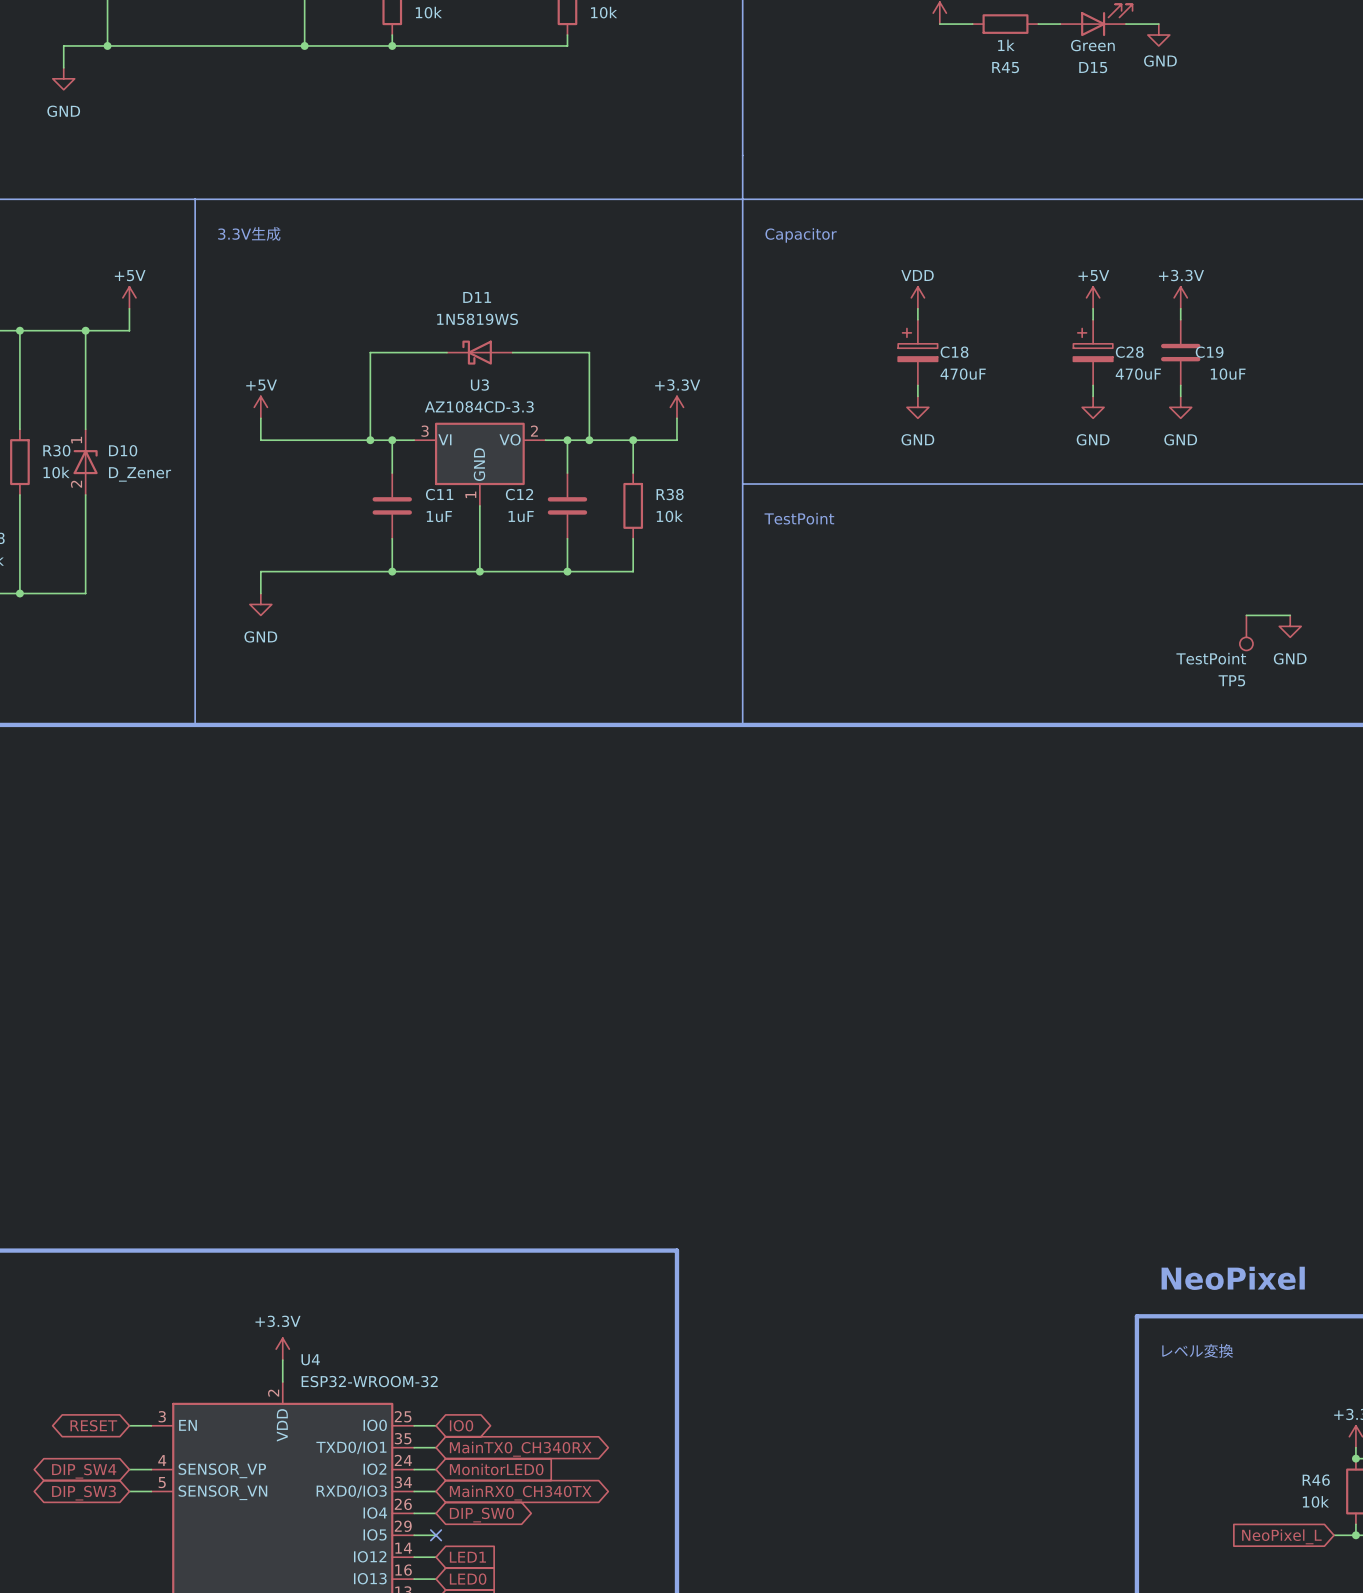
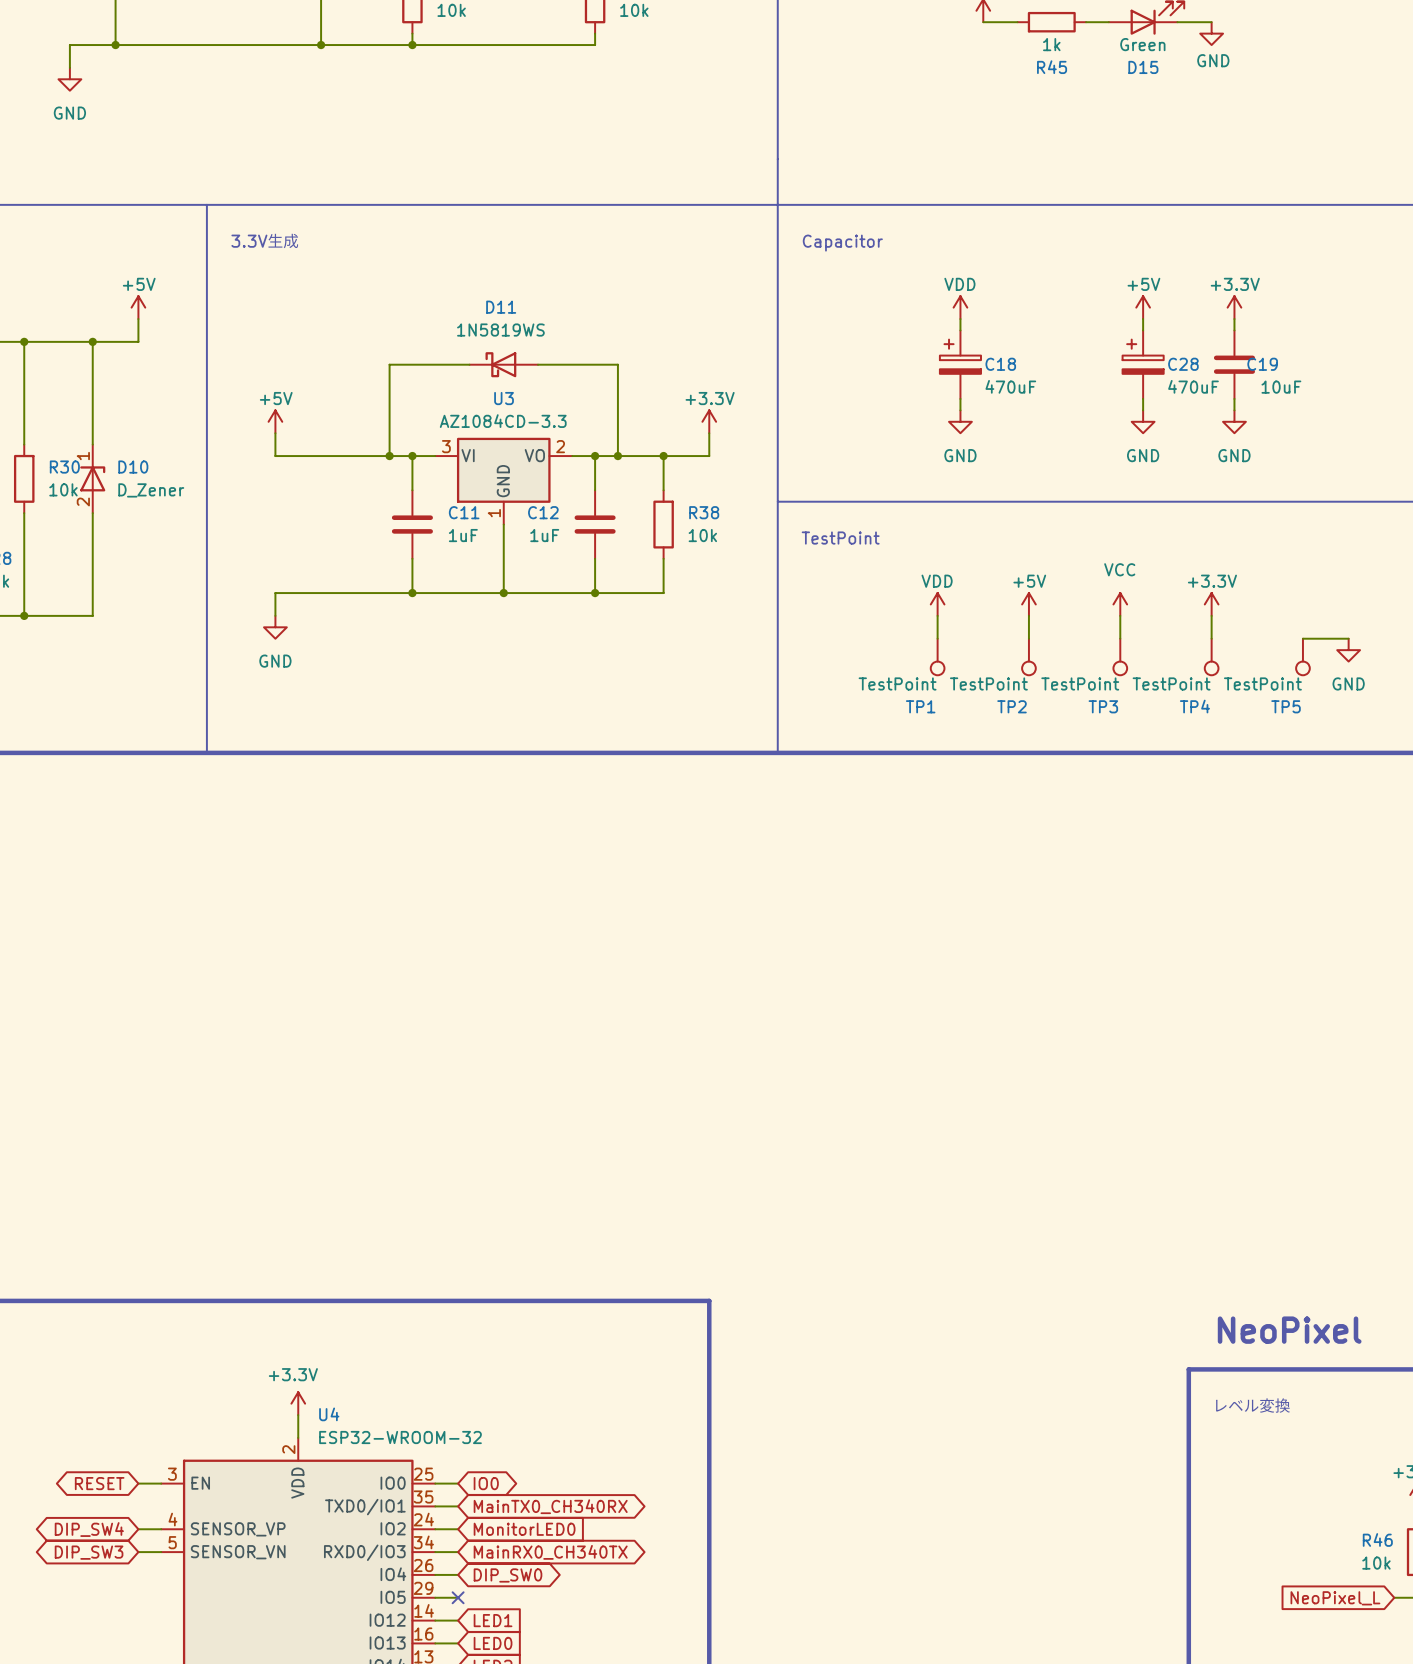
power symbol: none -> VDD (937, 604)
power symbol: none -> +5V (1028, 604)
power symbol: none -> VCC (1120, 604)
power symbol: none -> +3.3V (1211, 604)
wire: none -> (937, 615) (937, 638)
wire: none -> (1028, 615) (1028, 638)
wire: none -> (1120, 615) (1120, 638)
wire: none -> (1211, 615) (1211, 638)
TP1: none -> TestPoint (937, 656)
TP2: none -> TestPoint (1028, 656)
TP3: none -> TestPoint (1120, 656)
TP4: none -> TestPoint (1211, 656)

